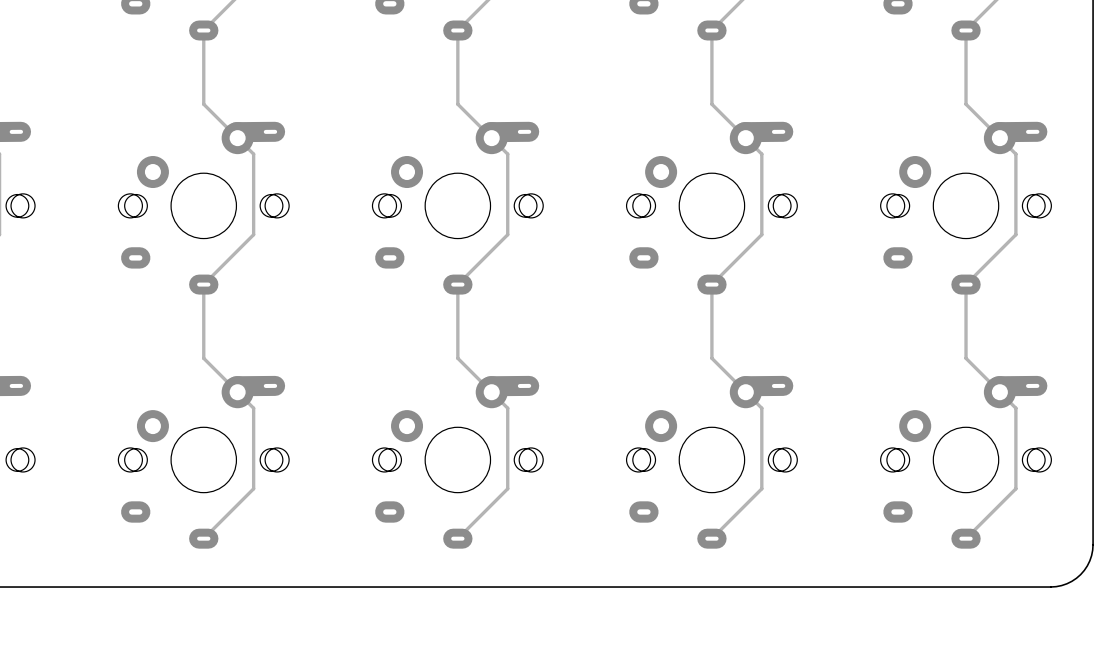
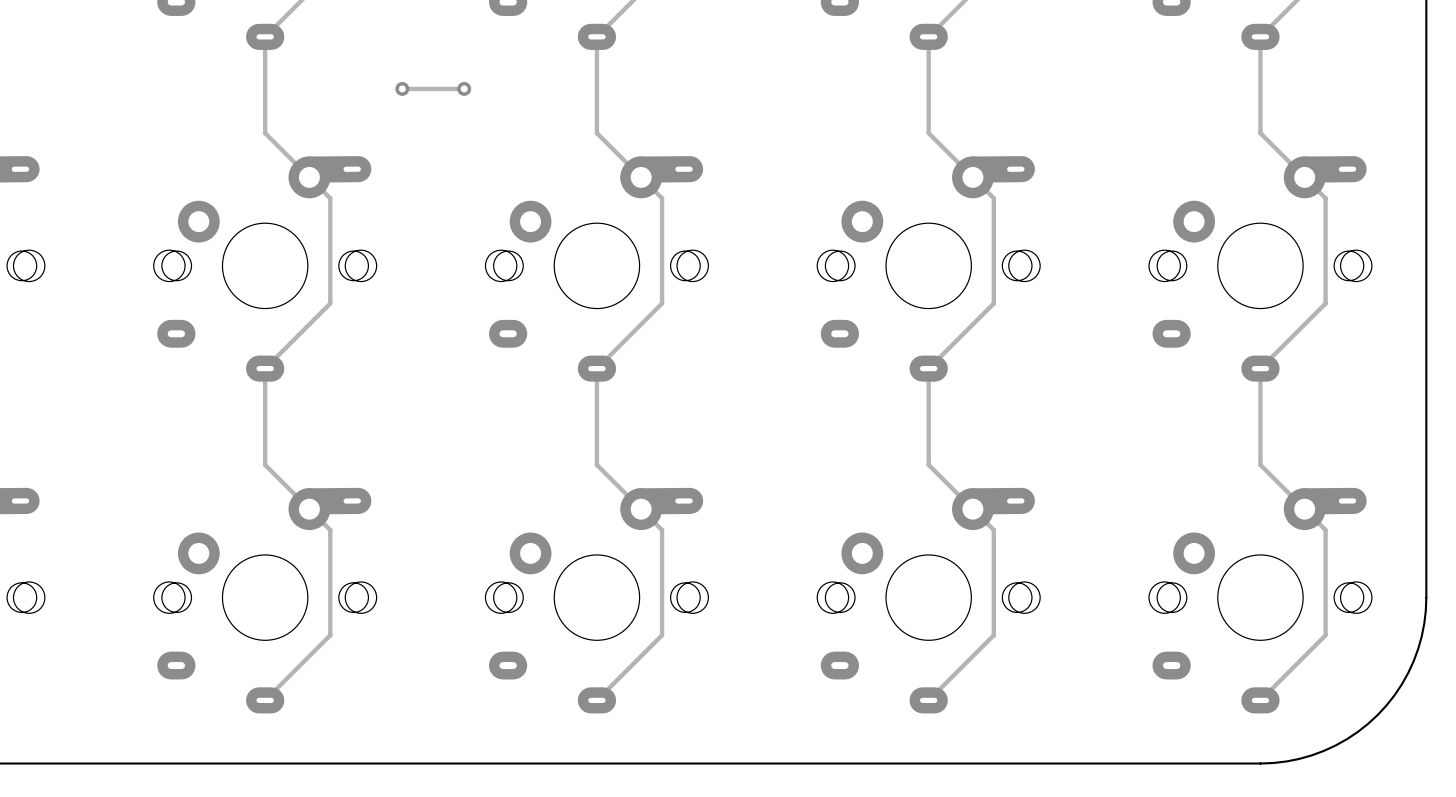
track: none -> (402, 88) (464, 88)
via: none -> (402, 88)
via: none -> (464, 88)
board edge: (1093, 459) (1092, 550) (1087, 565) (1080, 574) (1071, 581) (1056, 586) (966, 587) -> (1426, 597) (1421, 636) (1413, 661) (1401, 684) (1377, 714) (1347, 739) (1323, 750) (1299, 758) (1260, 763)

